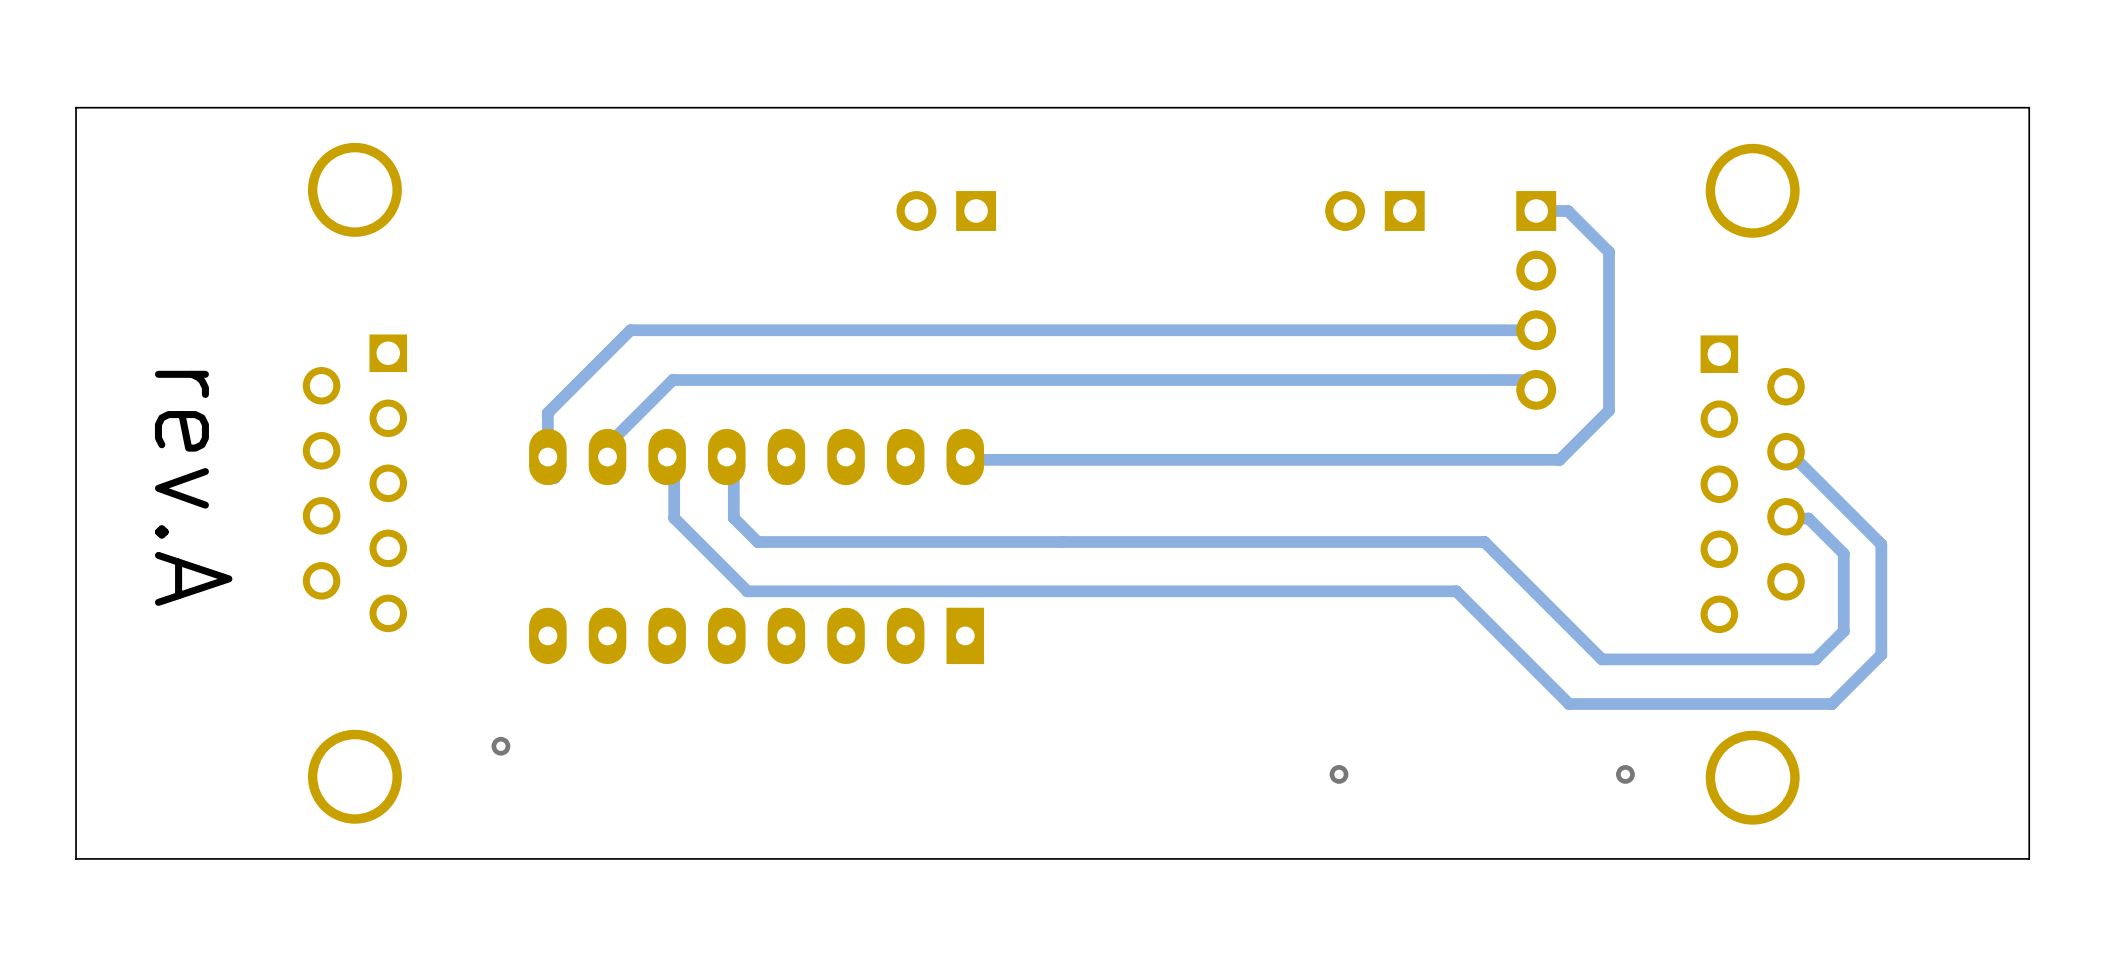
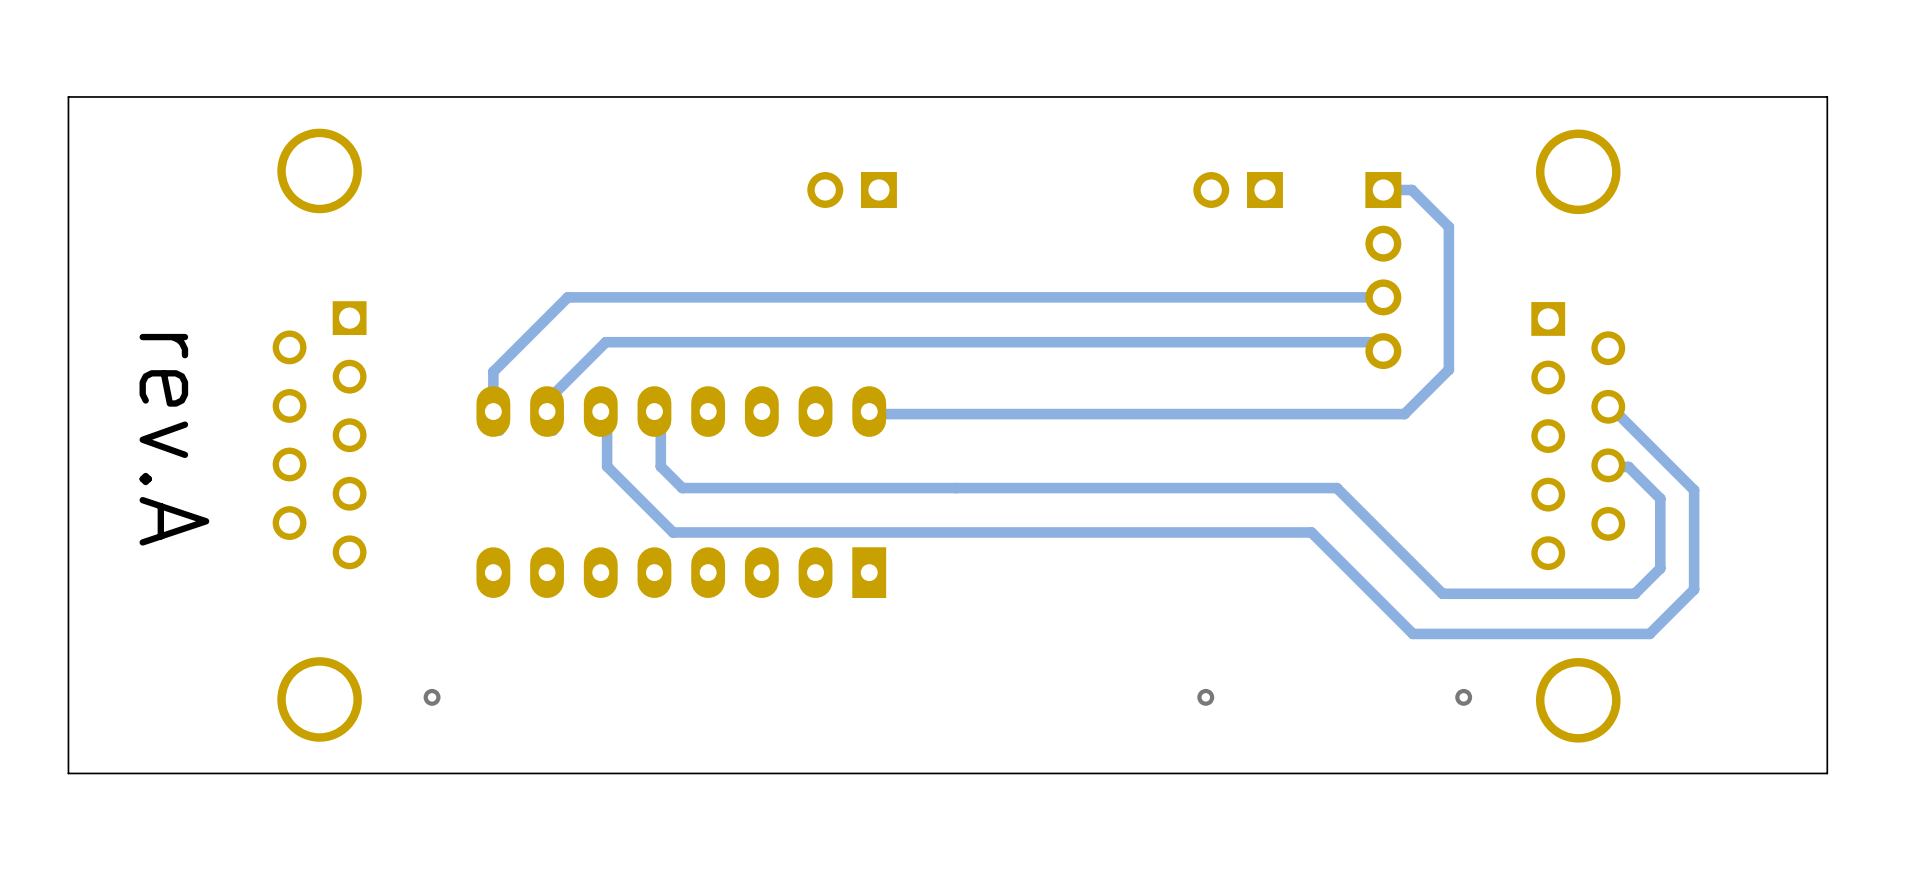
via position: (500, 746) -> (432, 697)

